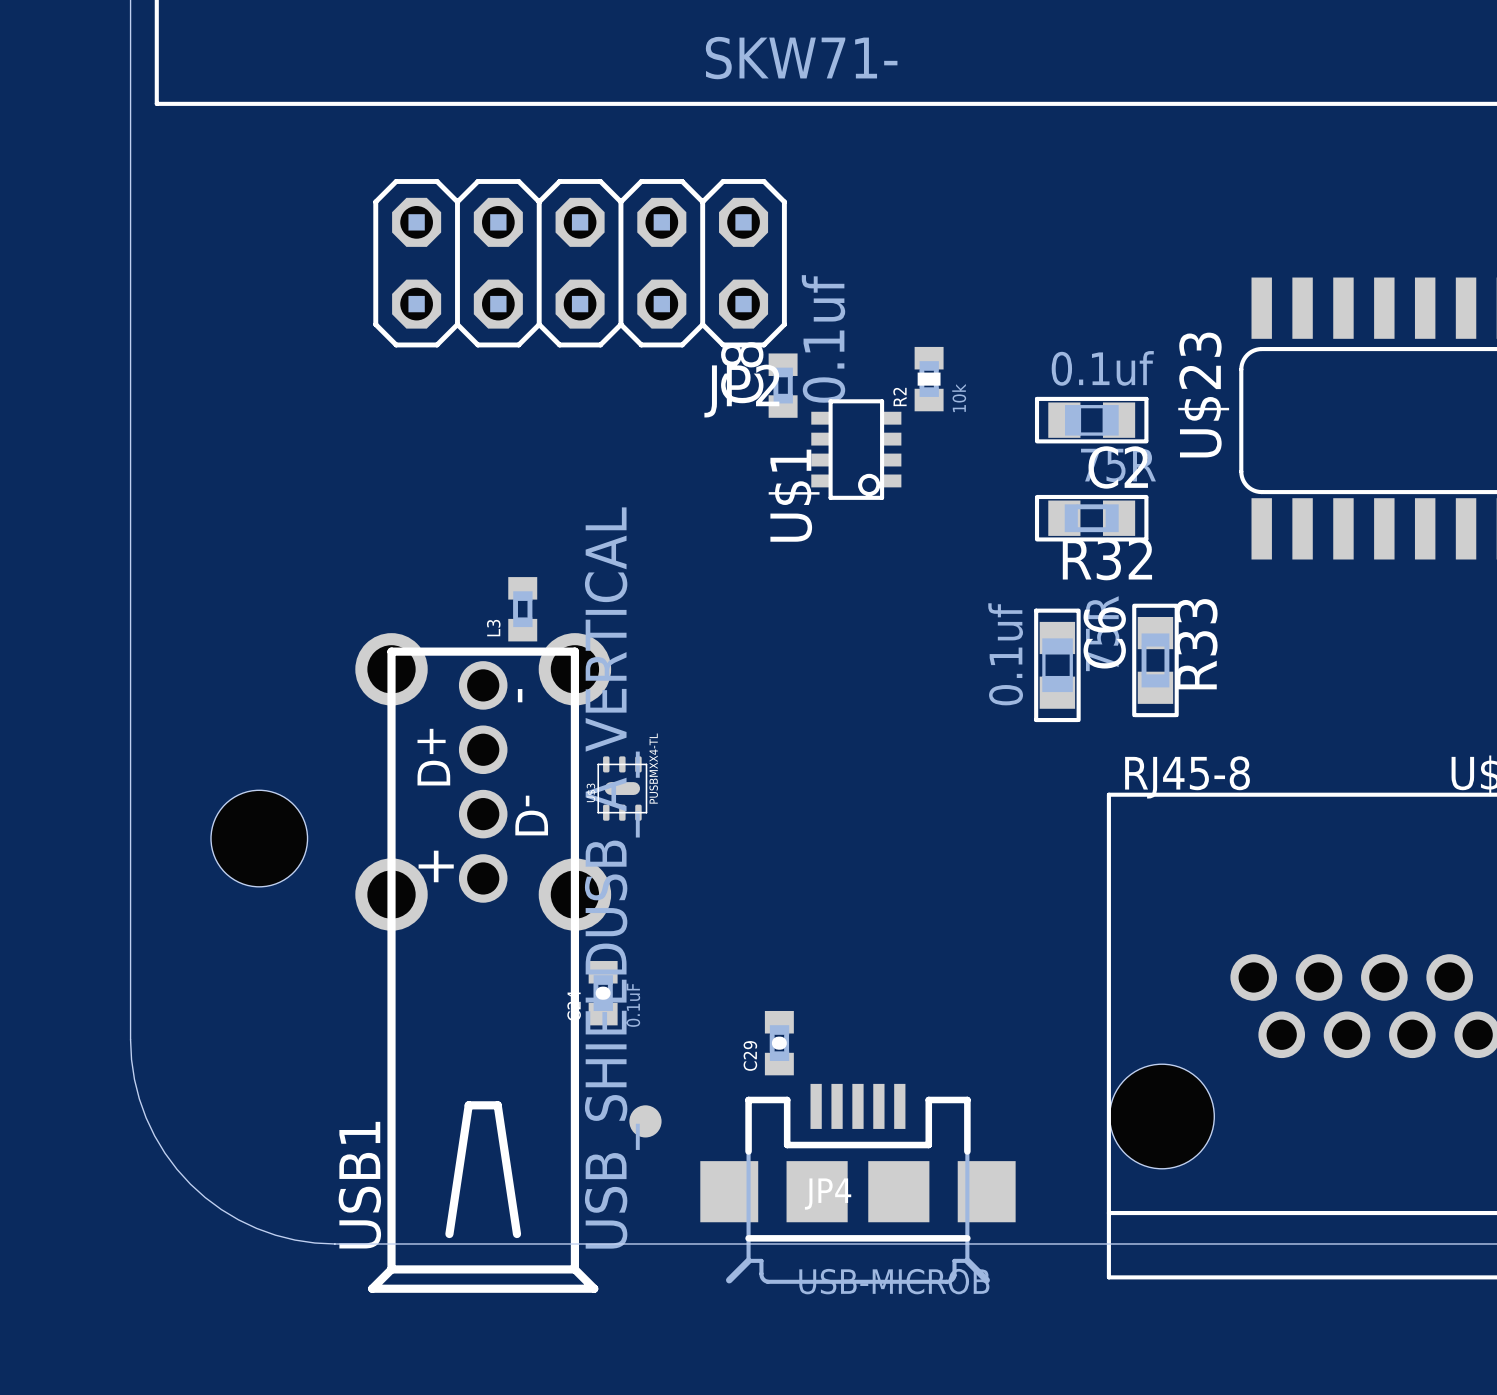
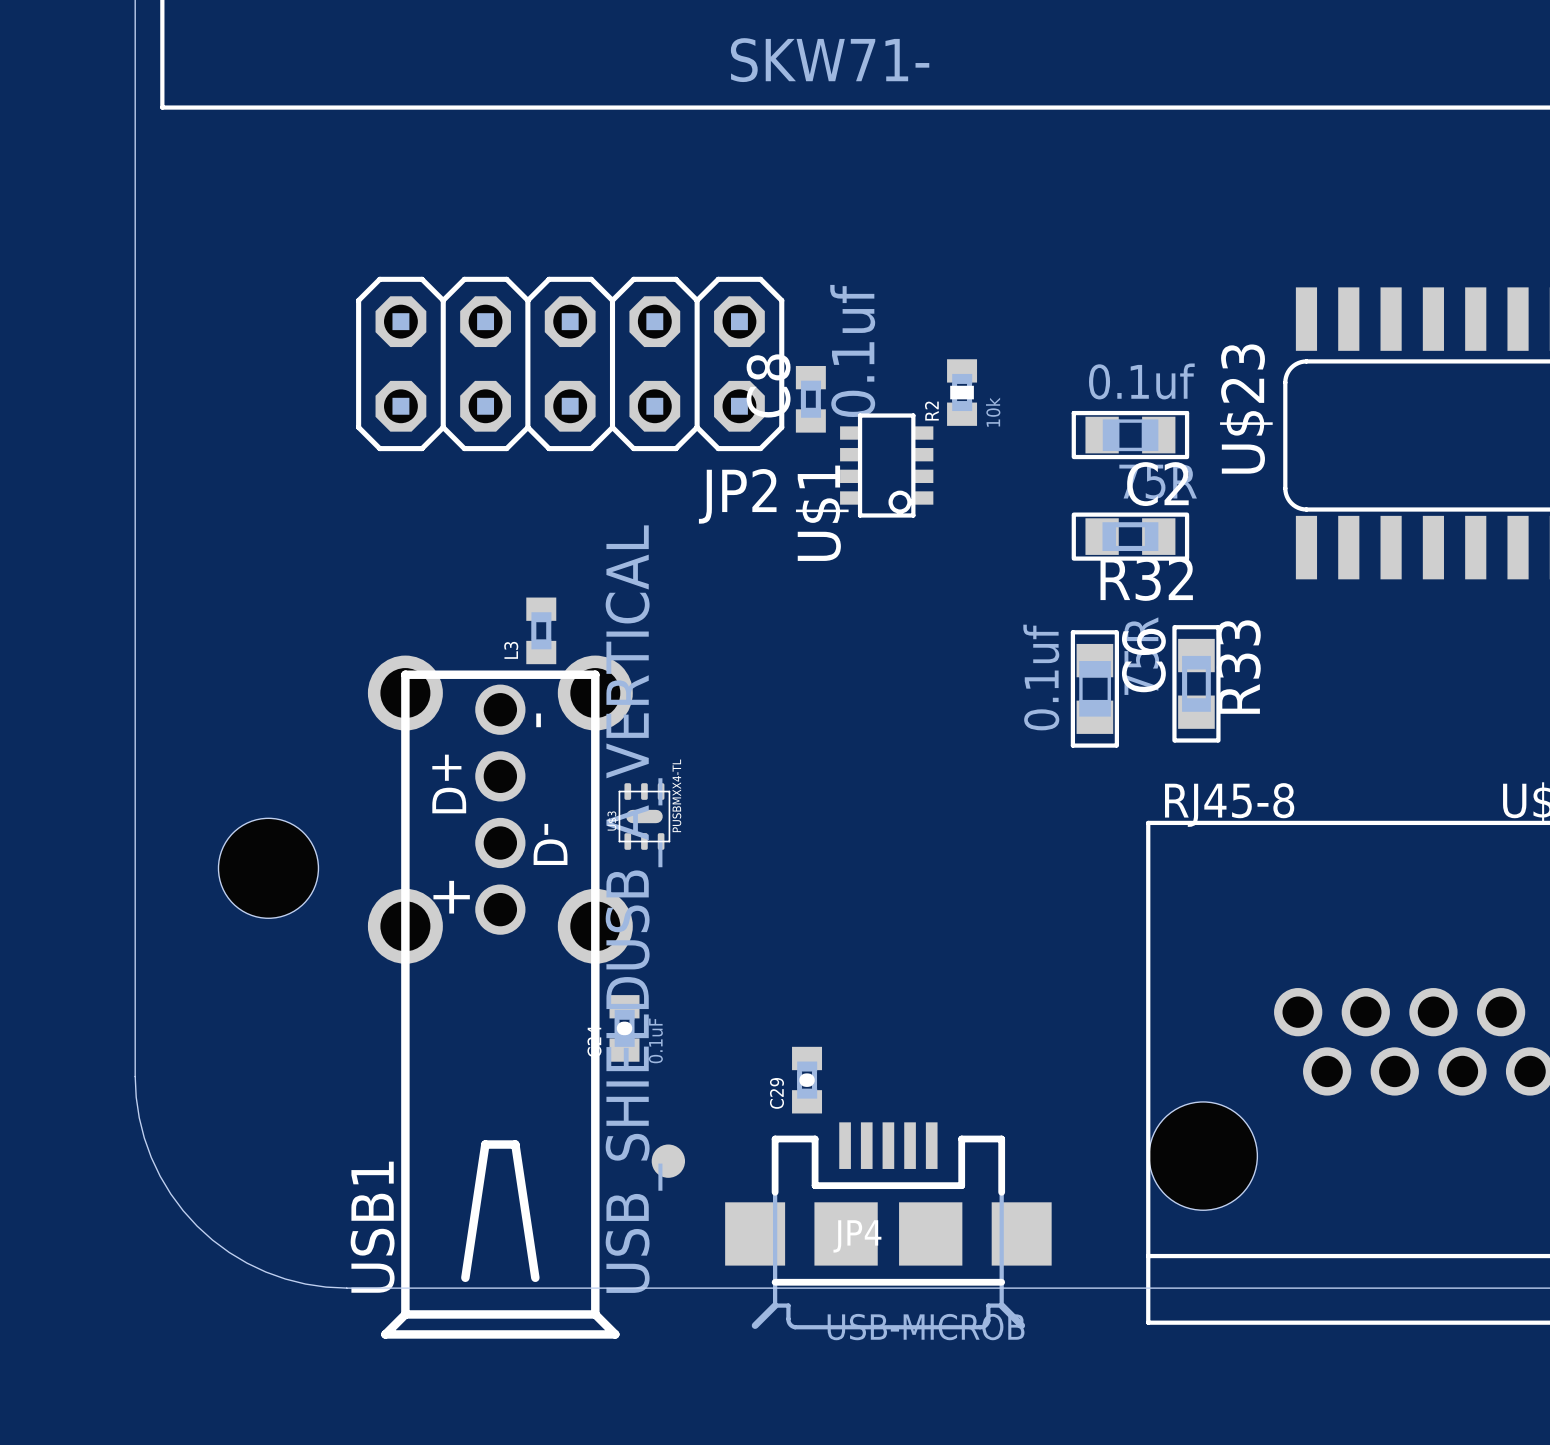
JP2 position: (580, 263) -> (570, 363)

